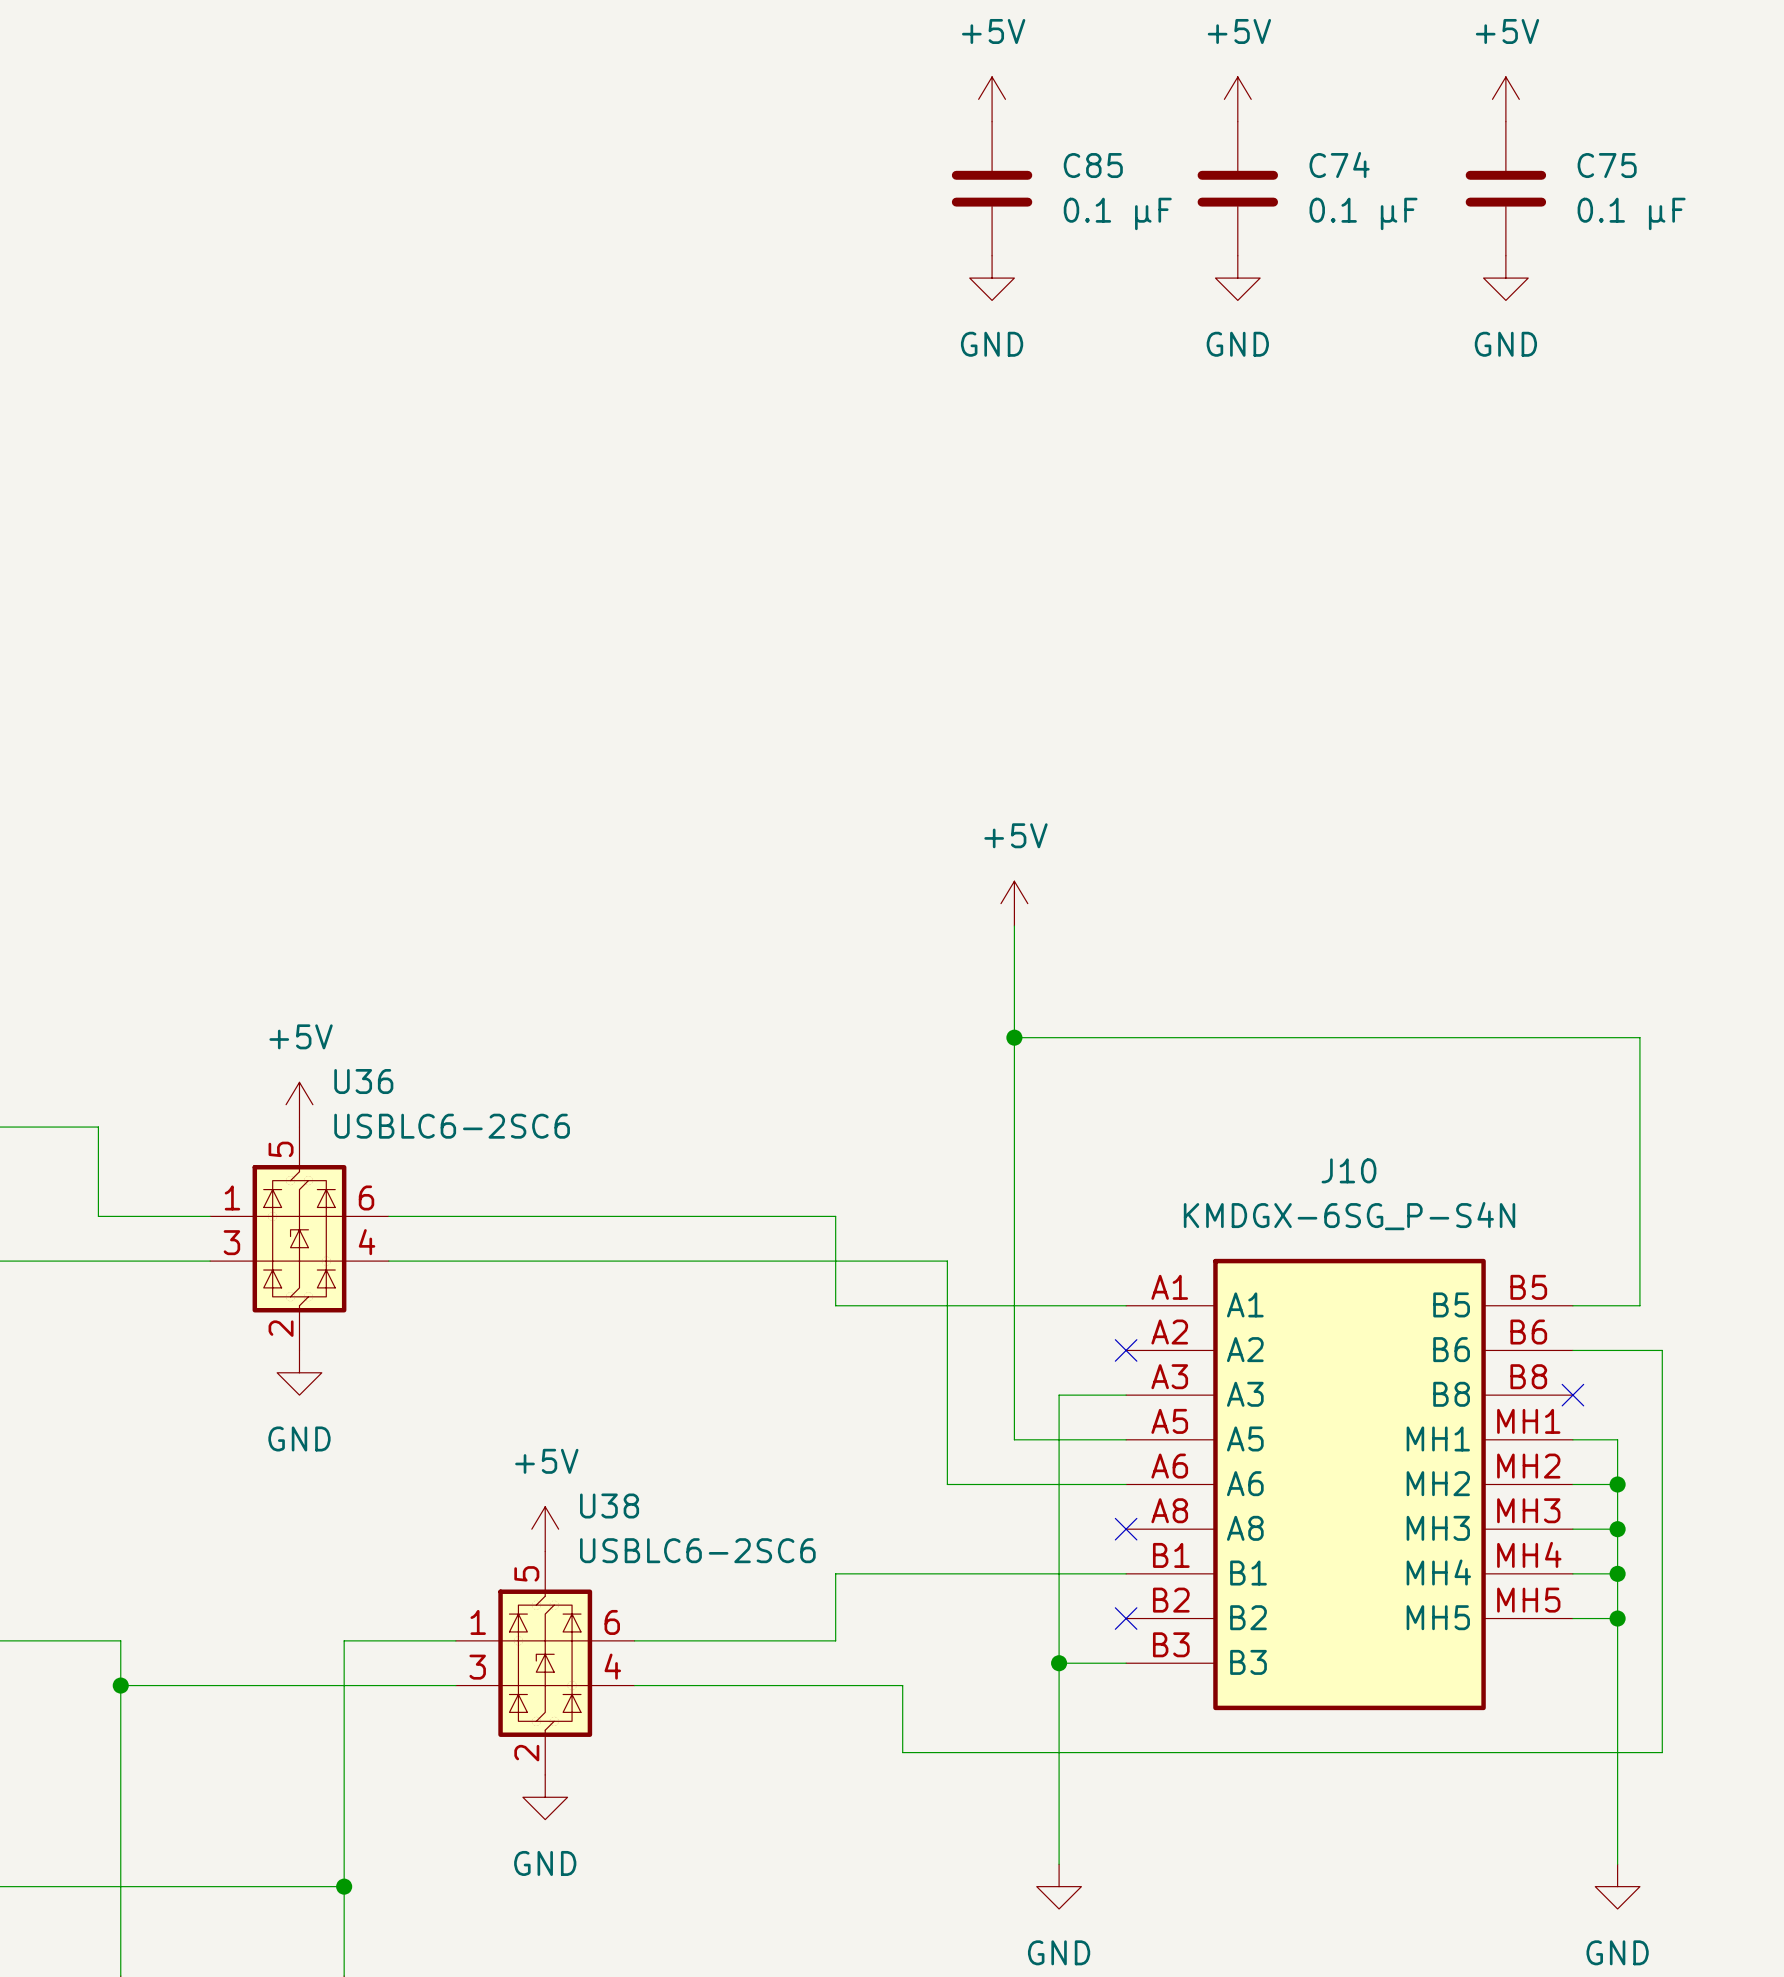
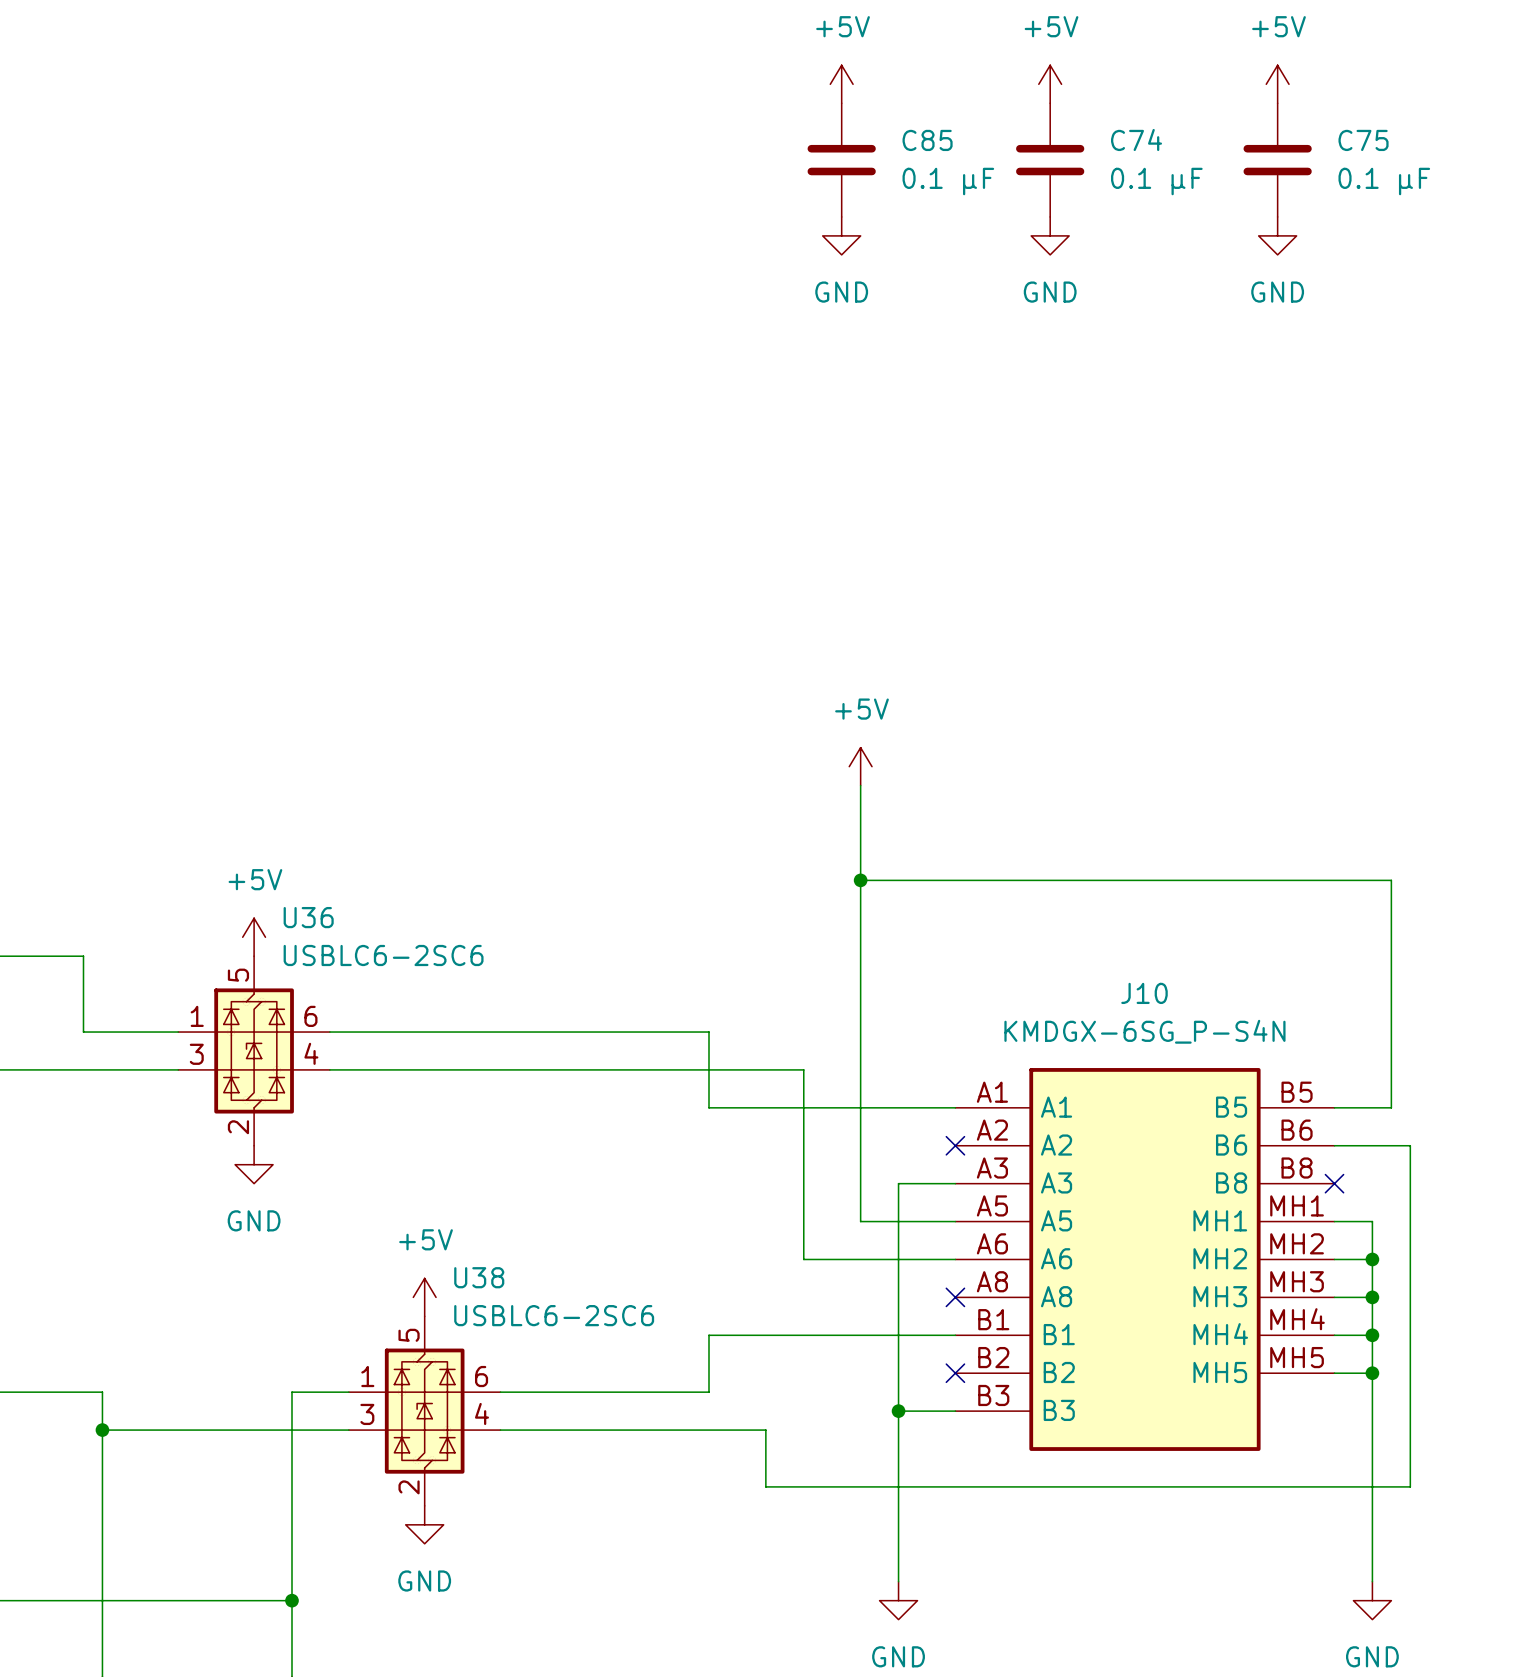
power symbol position: +5V (545, 1529) -> +5V (424, 1297)
U38 position: (545, 1663) -> (424, 1411)
power symbol position: GND (545, 1797) -> GND (424, 1524)

